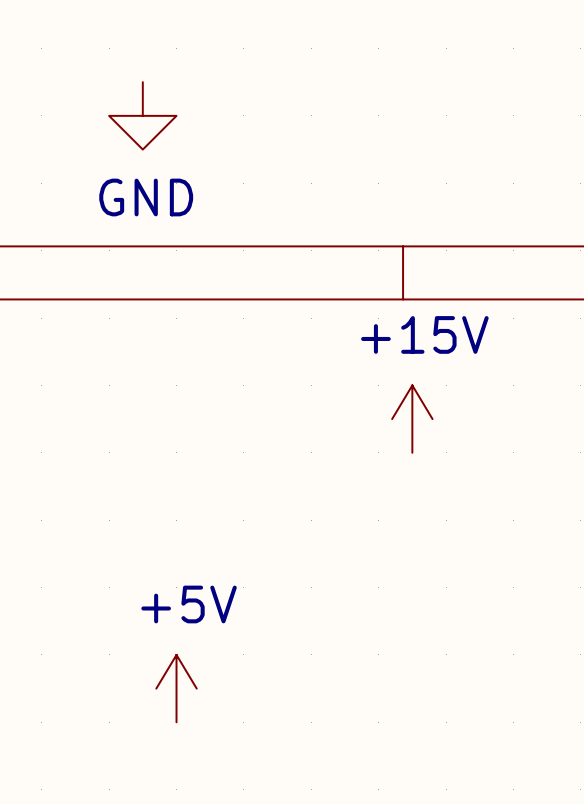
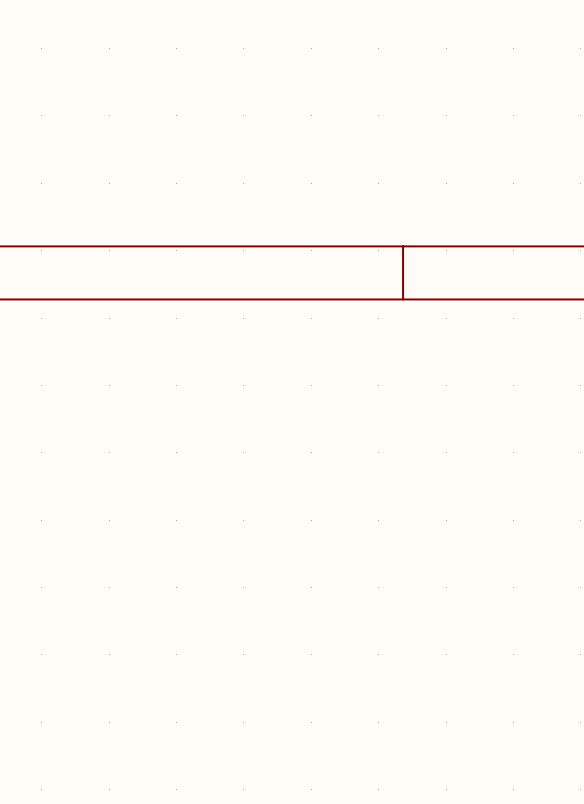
power symbol: GND (142, 115) -> none
power symbol: +15V (412, 419) -> none
power symbol: +5V (176, 688) -> none

